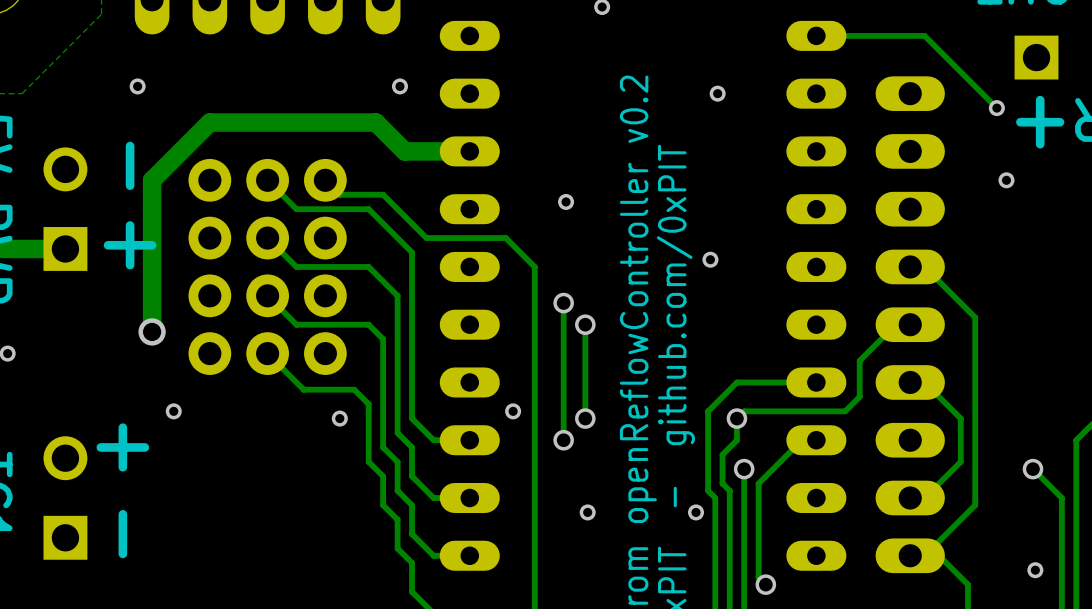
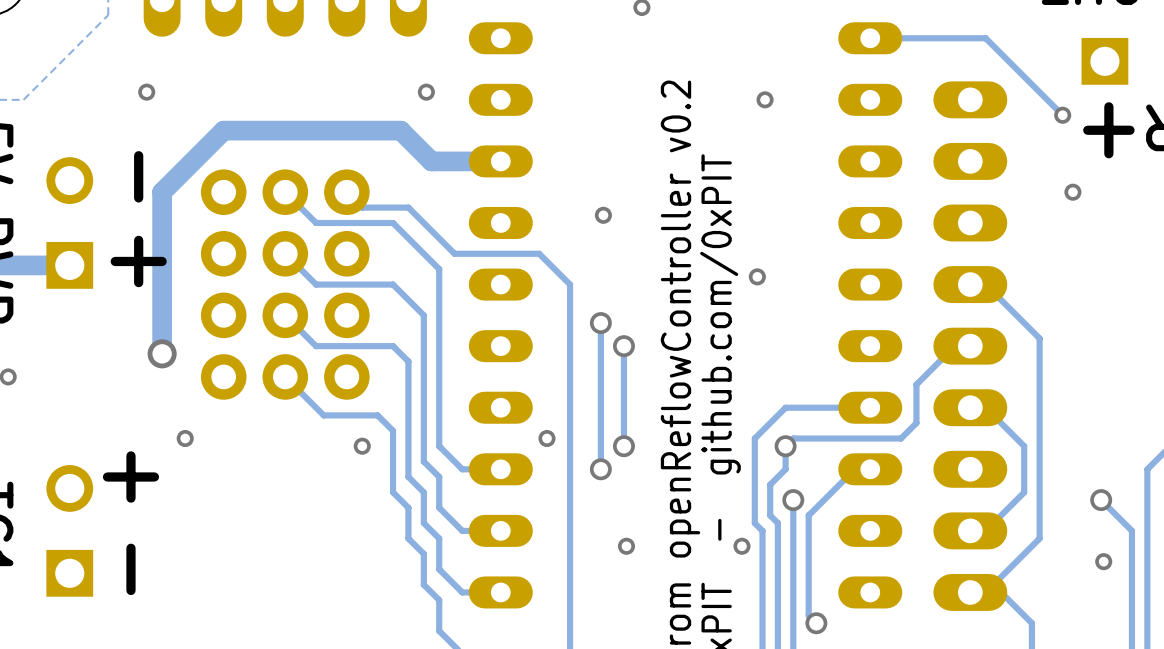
via position: (1035, 570) -> (1103, 561)

